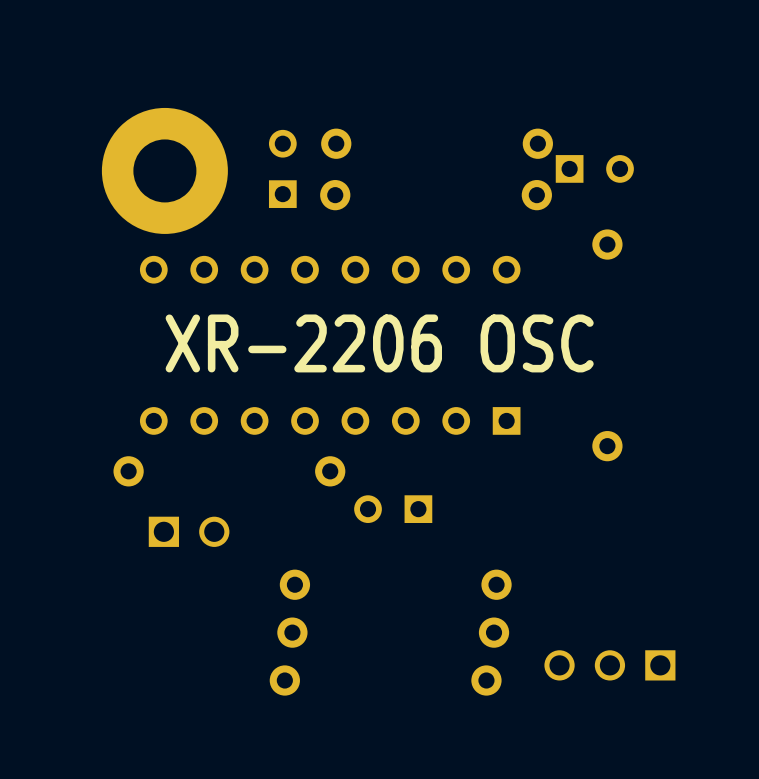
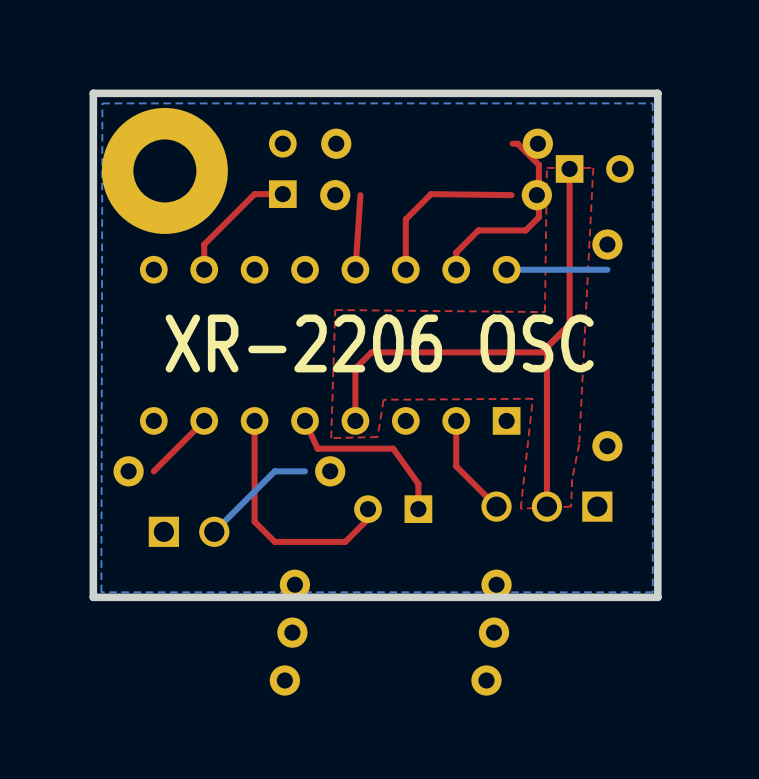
board edge: none -> (657, 93) (93, 93) (93, 597) (657, 597) (657, 93)
bottom zone outline: none -> (652, 103) (102, 103) (101, 592) (652, 592) (652, 103)
top track: none -> (512, 143) (517, 143) (538, 164) (538, 217) (525, 230) (478, 230) (456, 252) (456, 269)
top zone outline: none -> (593, 167) (546, 167) (544, 312) (335, 310) (331, 438) (377, 437) (383, 399) (532, 398) (520, 508) (571, 506) (572, 479) (579, 444) (593, 167)
top track: none -> (569, 168) (569, 324) (541, 352) (371, 352) (355, 368) (355, 420)
top track: none -> (282, 194) (254, 194) (204, 244) (204, 269)
top track: none -> (360, 195) (355, 269)
top track: none -> (511, 195) (431, 194) (405, 219) (405, 269)
bottom track: none -> (607, 269) (506, 269)
top track: none -> (546, 347) (546, 506)
top track: none -> (204, 420) (153, 471)
top track: none -> (254, 420) (254, 521) (274, 541) (345, 541) (368, 519) (368, 509)
top track: none -> (305, 420) (317, 448) (393, 448) (418, 483) (418, 509)
top track: none -> (456, 420) (456, 466) (496, 506)
bottom track: none -> (305, 471) (274, 471) (214, 531)
part position: (609, 665) -> (546, 506)

